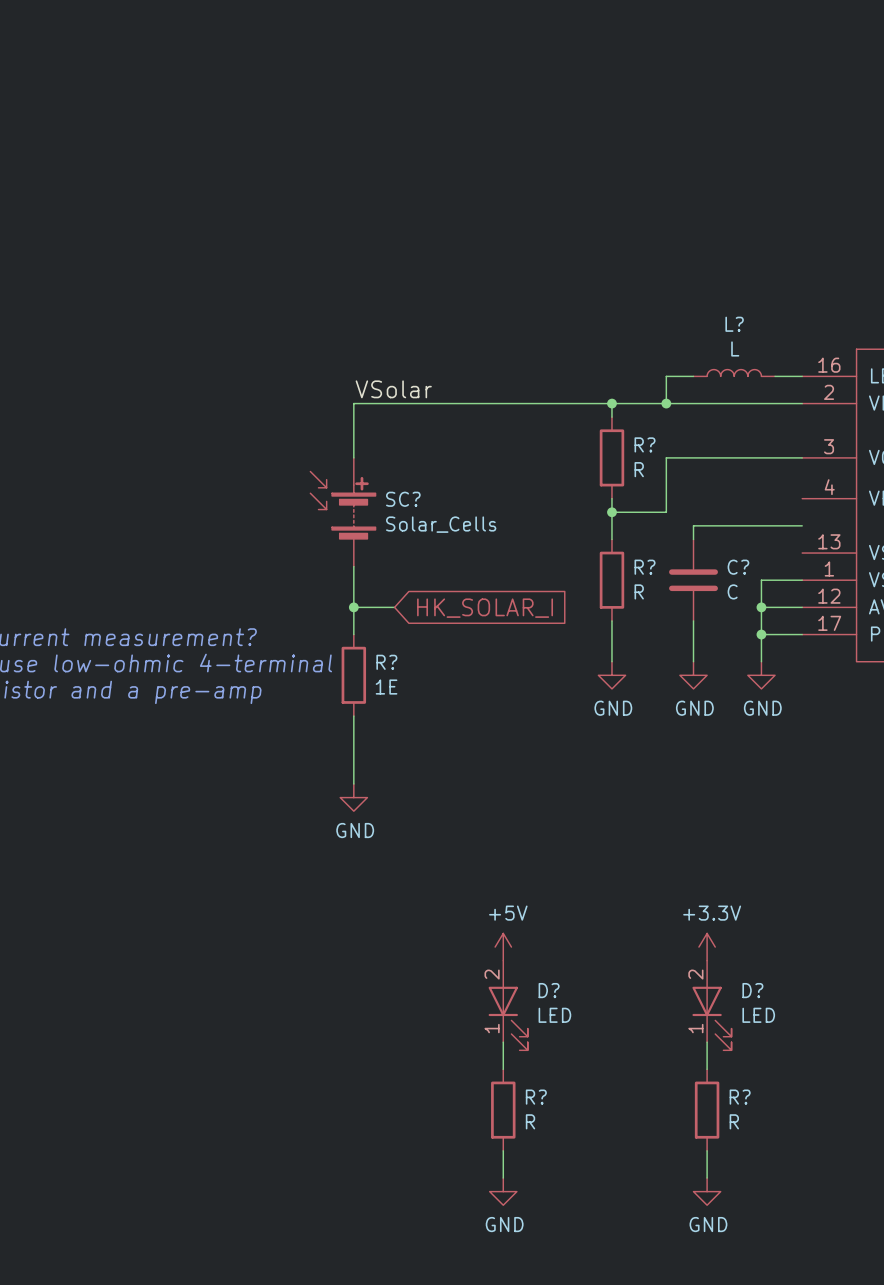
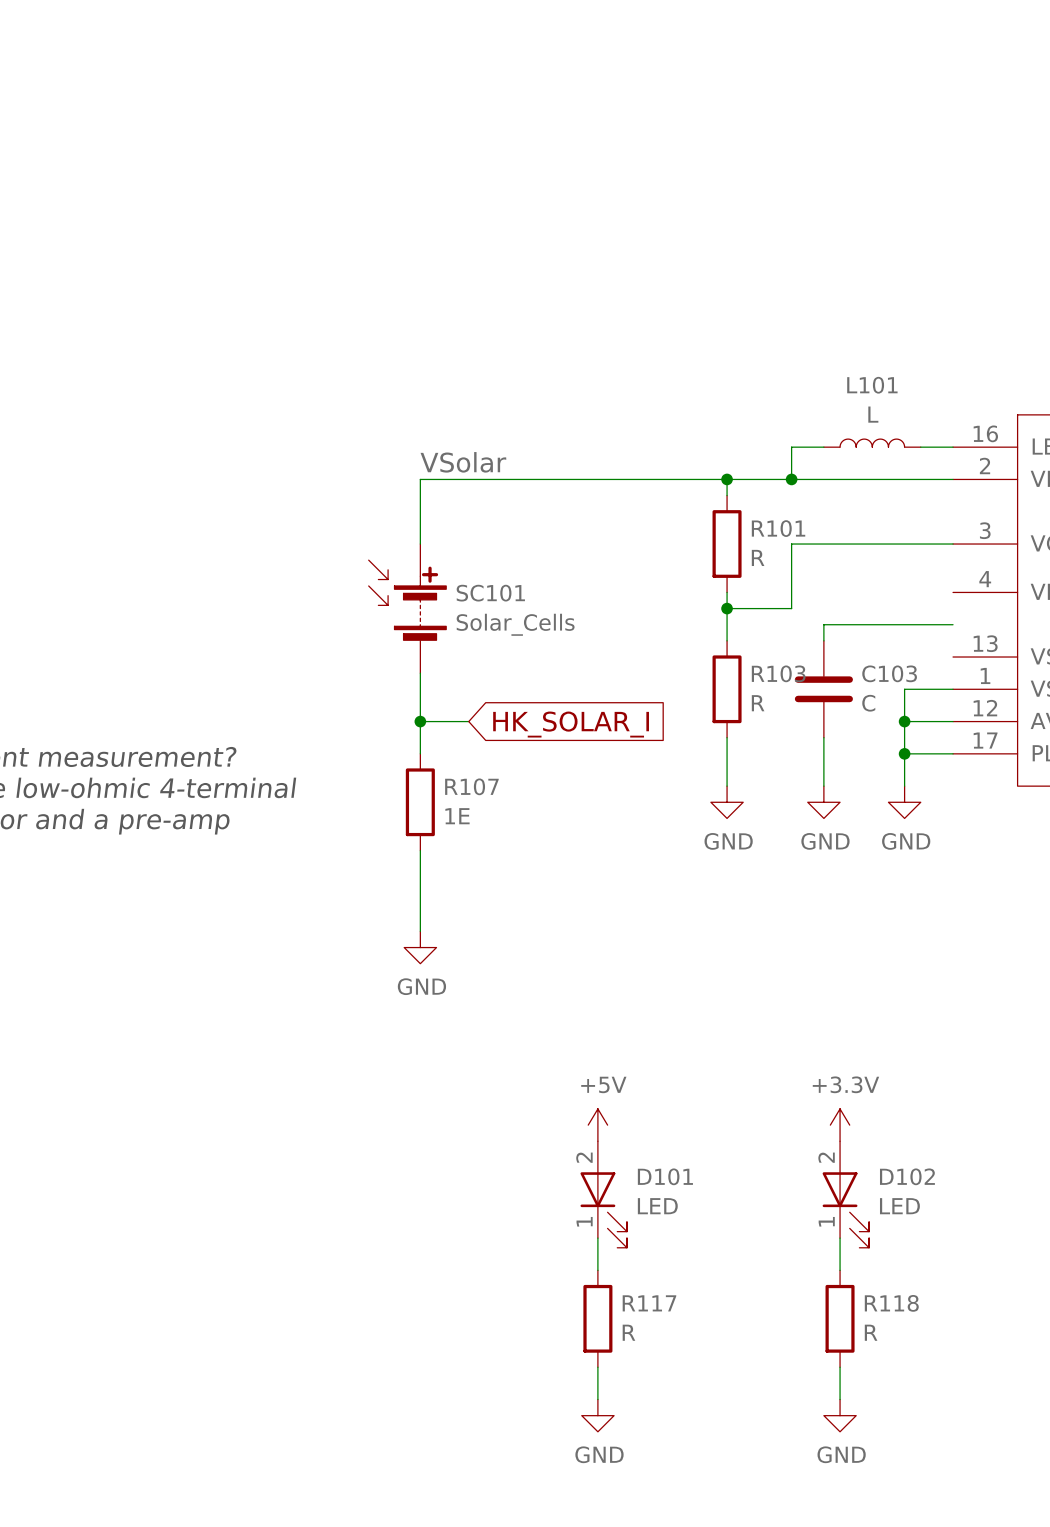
L? name: L? (734, 324) -> L101 (872, 385)
R? name: R? (645, 444) -> R101 (778, 528)
SC? name: SC? (403, 499) -> SC101 (490, 593)
R? name: R? (645, 567) -> R103 (778, 673)
C? name: C? (738, 567) -> C103 (889, 673)
R? name: R? (386, 662) -> R107 (471, 786)
D? name: D? (549, 990) -> D101 (665, 1176)
D? name: D? (752, 990) -> D102 (907, 1176)
R? name: R? (536, 1097) -> R117 (649, 1303)
R? name: R? (740, 1097) -> R118 (891, 1303)

